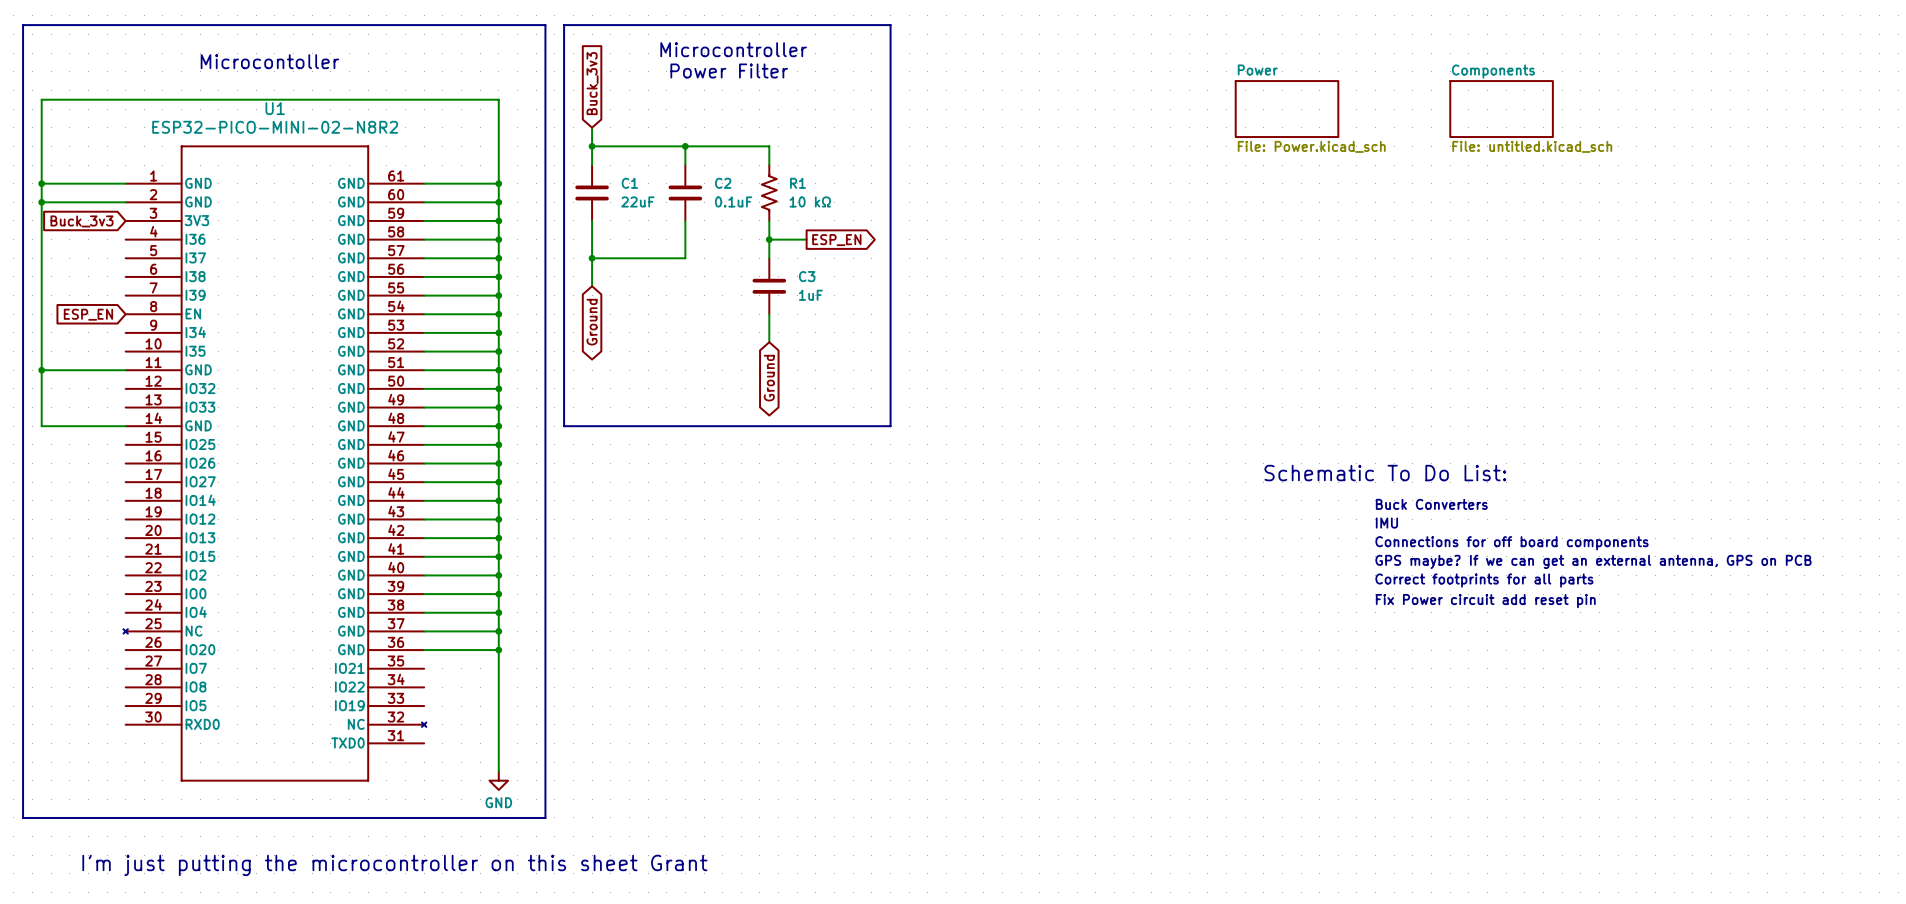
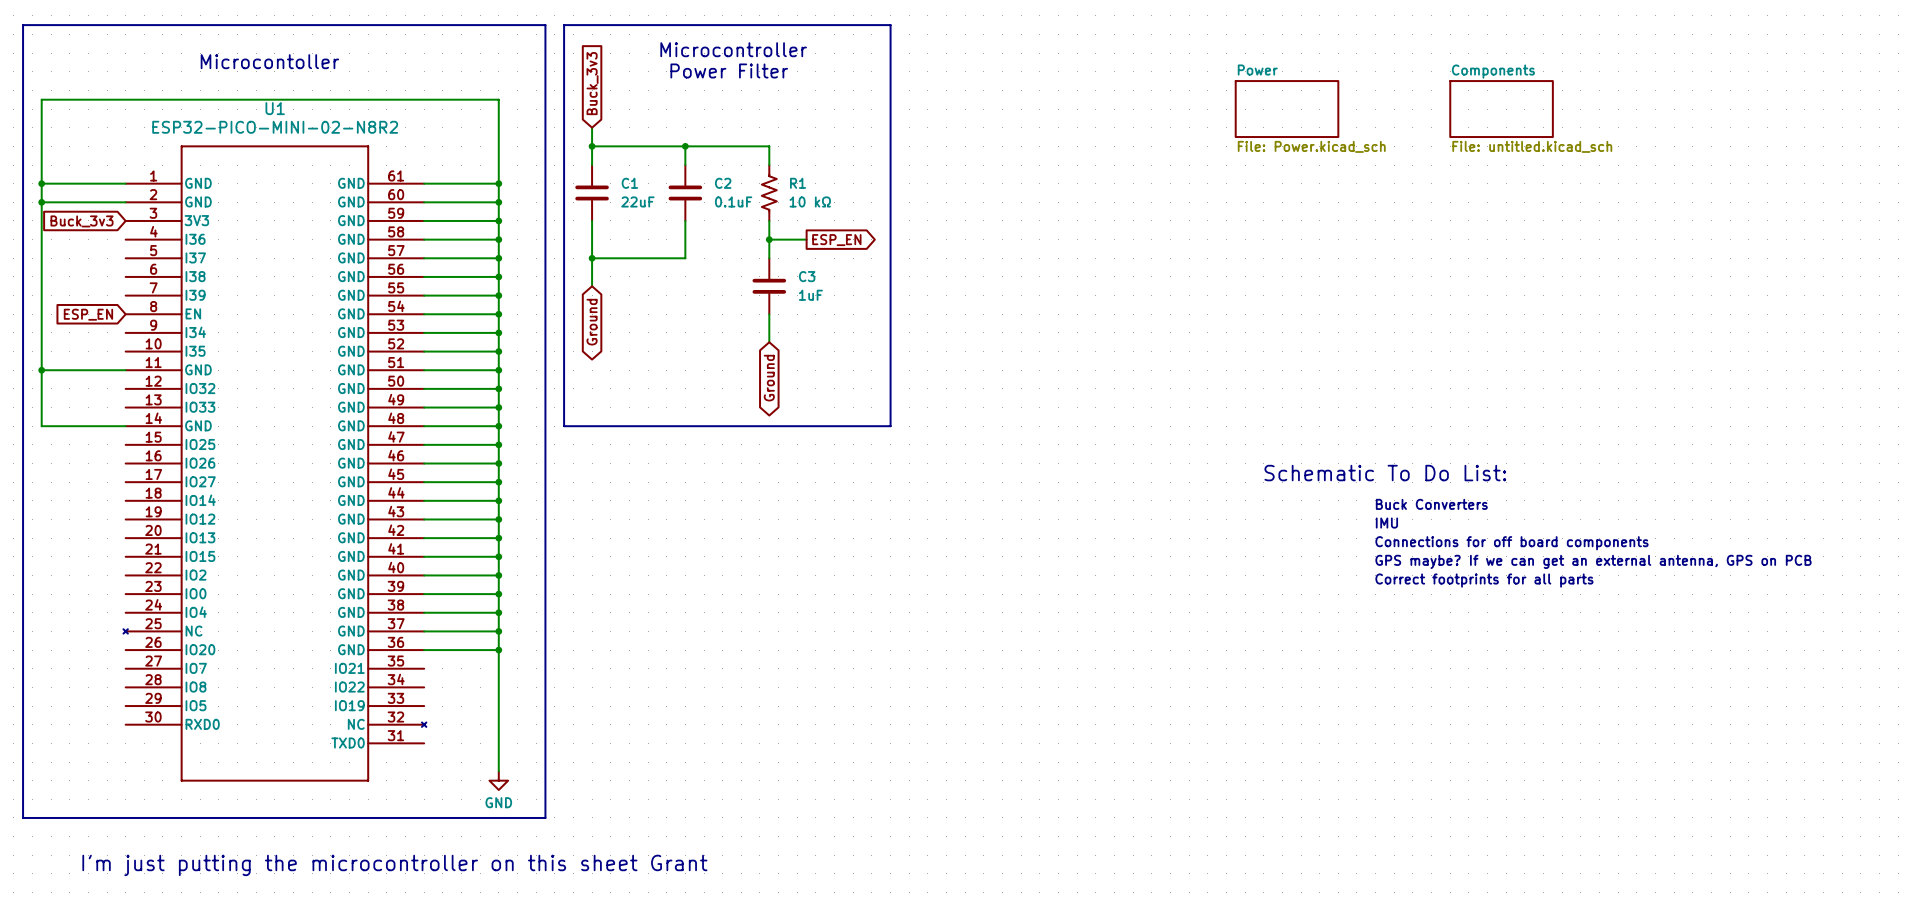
text: Fix Power circuit add reset pin (1485, 601) -> none

